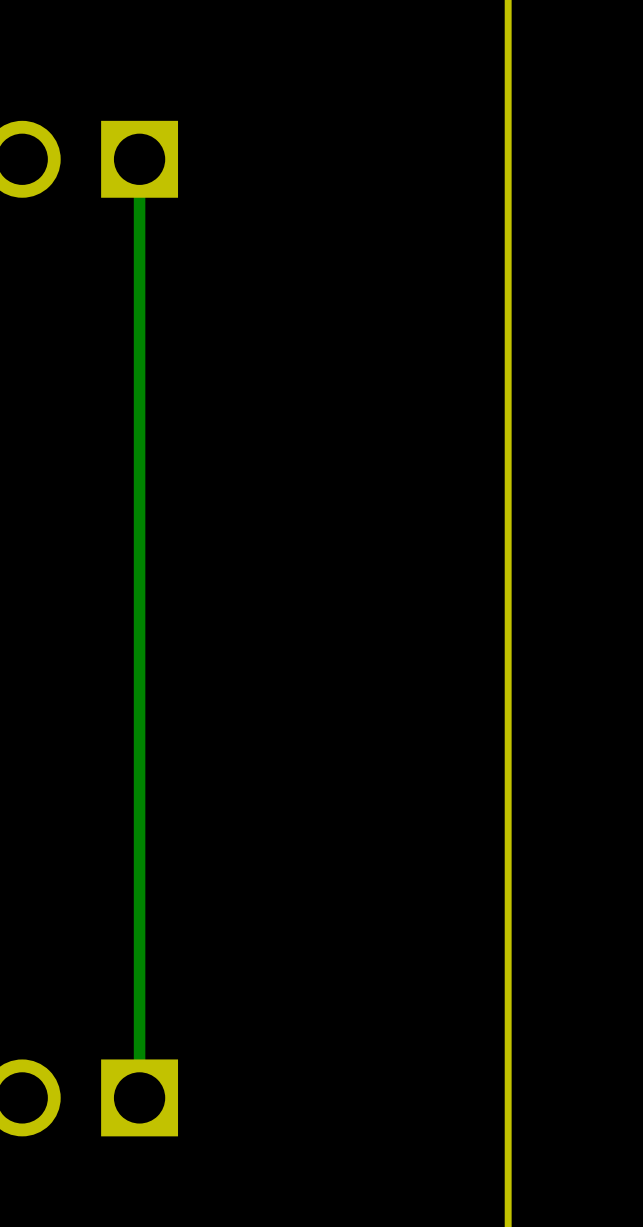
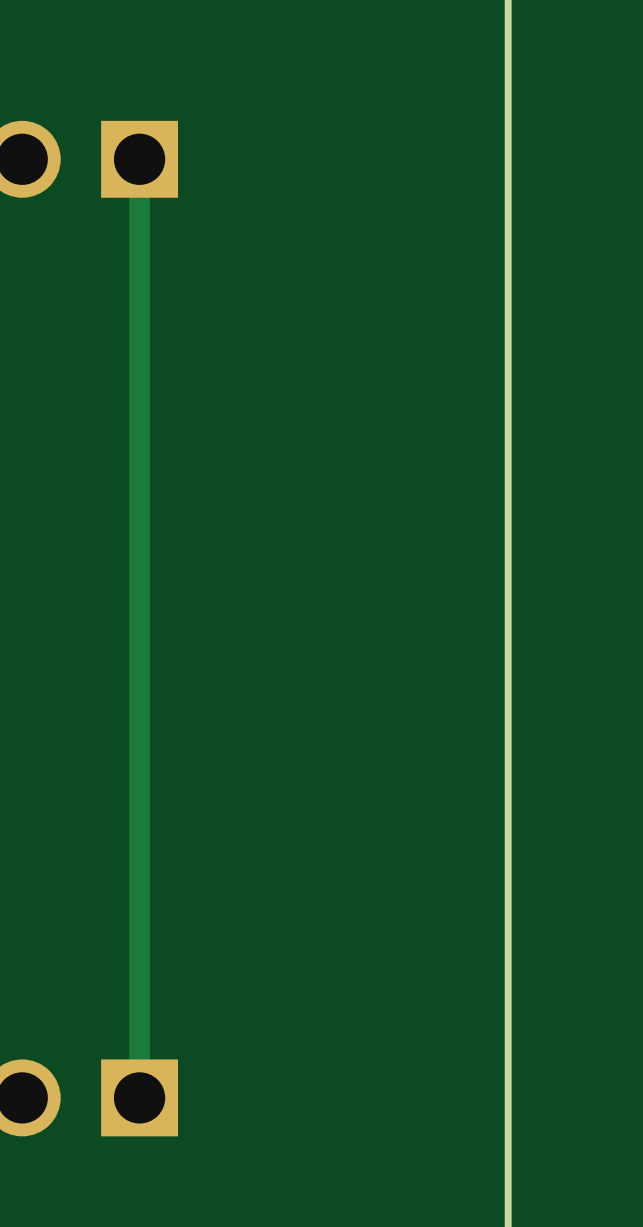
track width: thin (139, 159) (139, 1097) -> thick (139, 159) (139, 1097)

